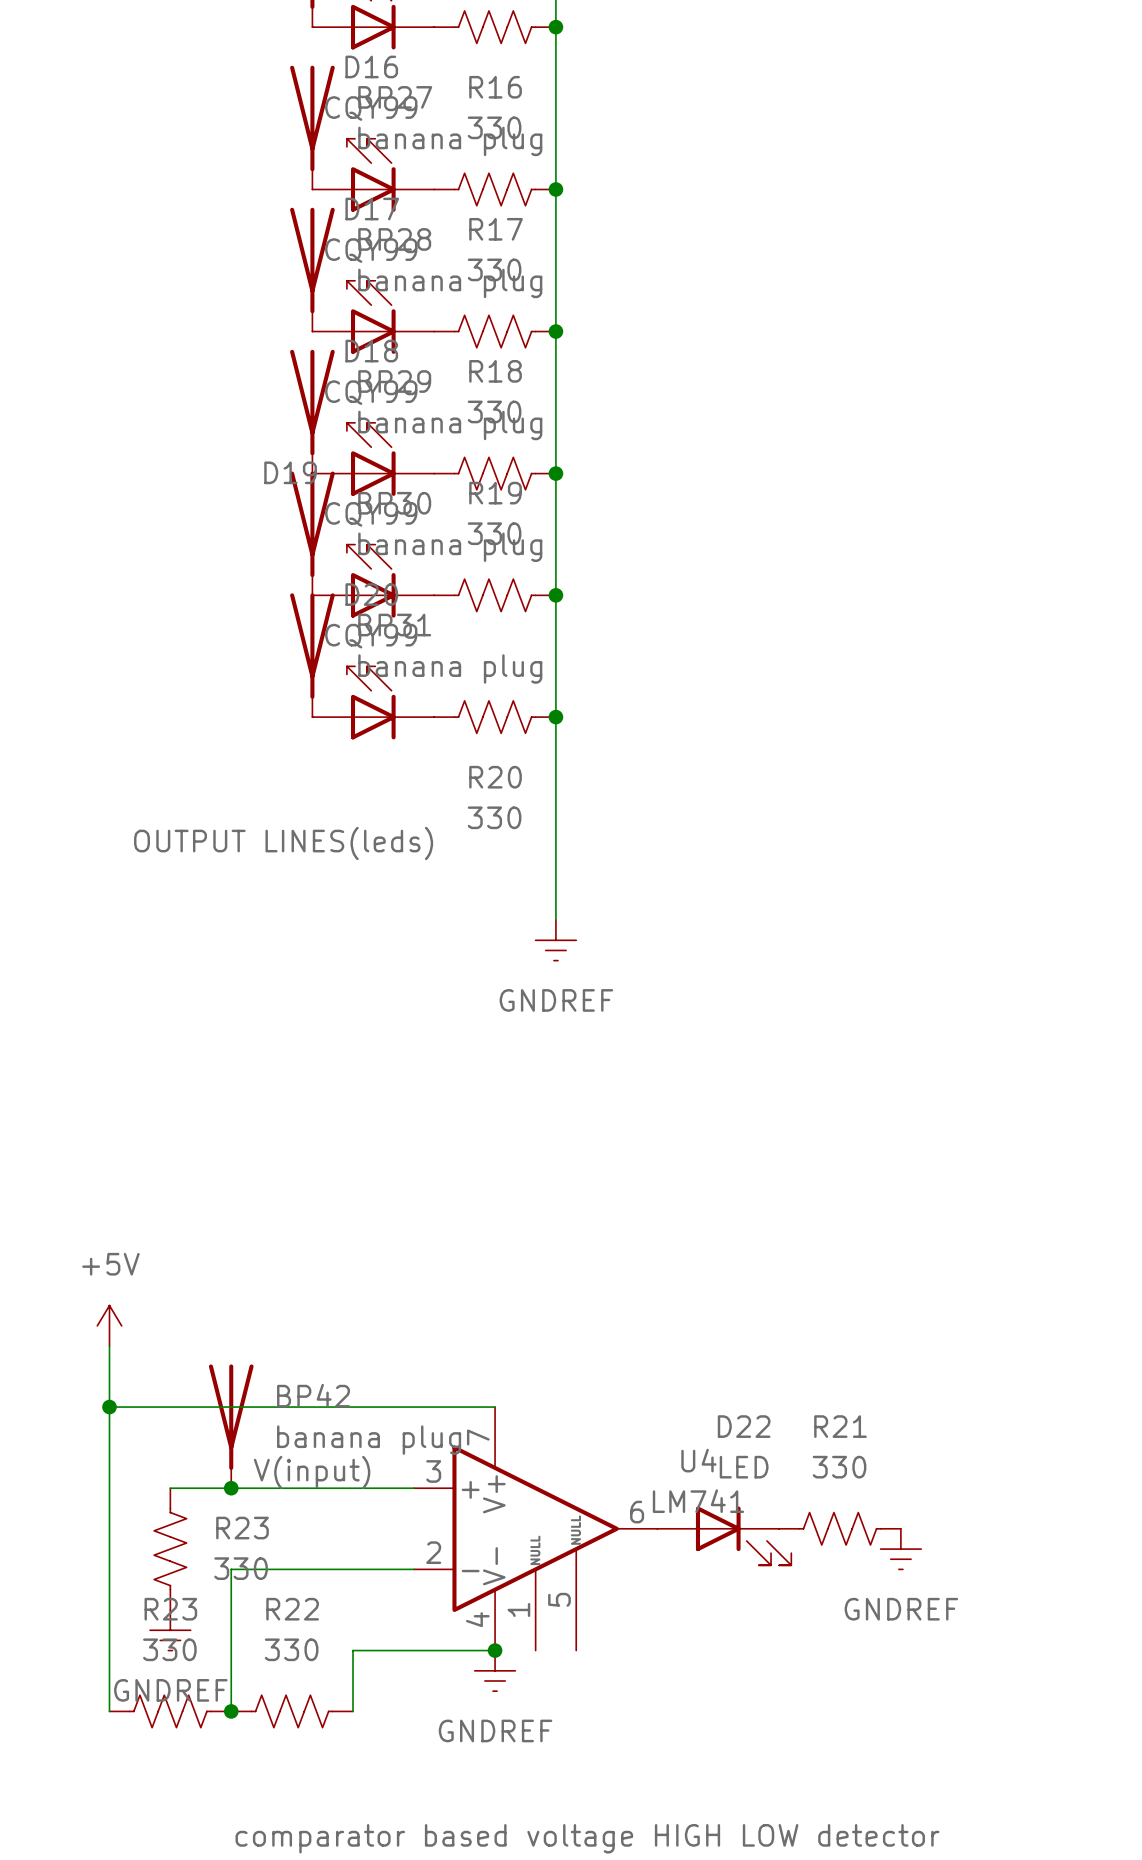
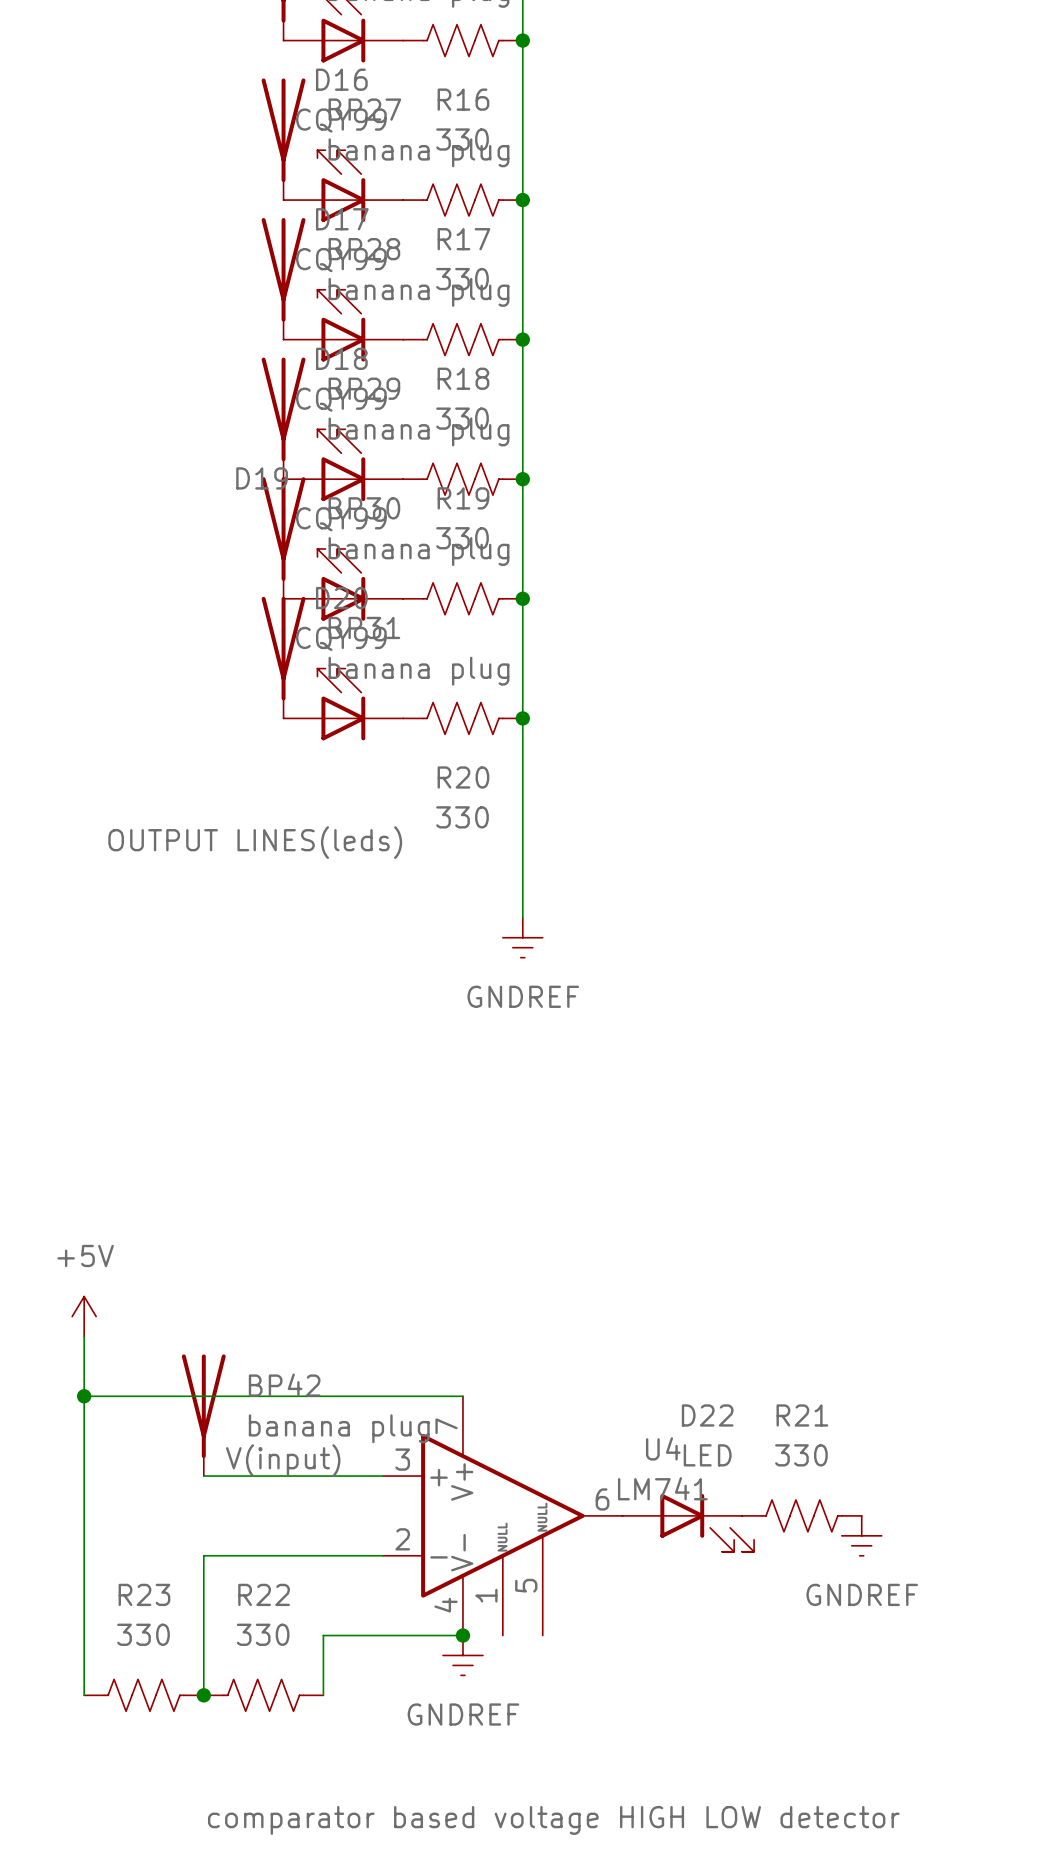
wire: (170, 1488) (231, 1488) -> none
junction: (231, 1488) -> none
R23: 330 (170, 1549) -> none
power symbol: GNDREF (170, 1630) -> none

